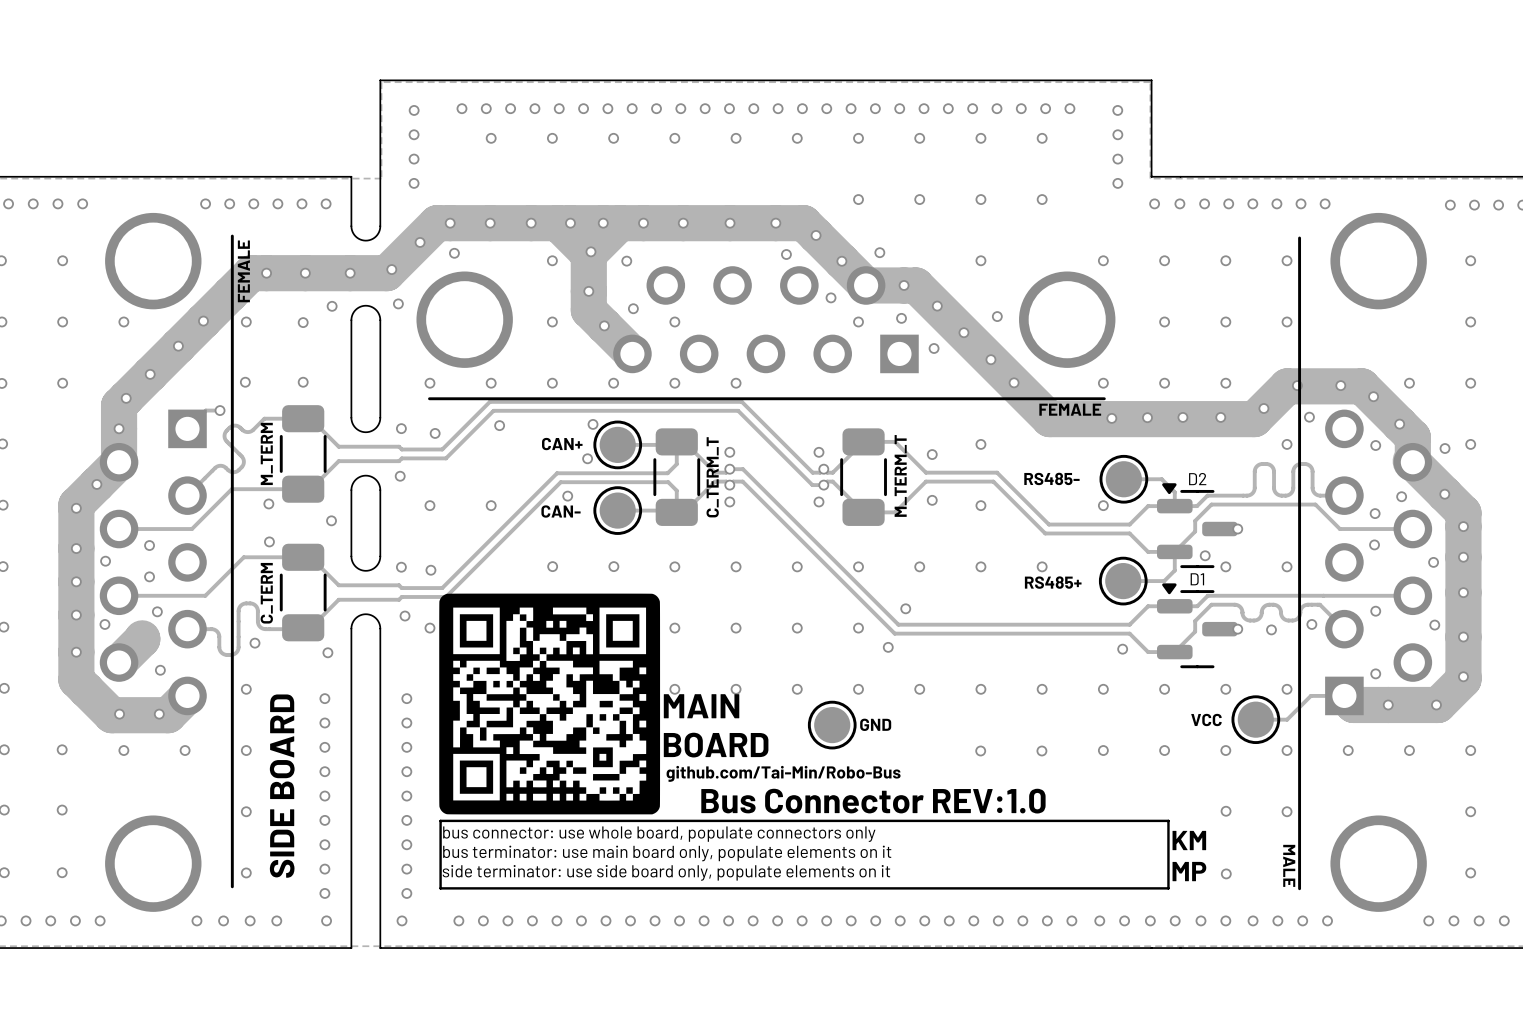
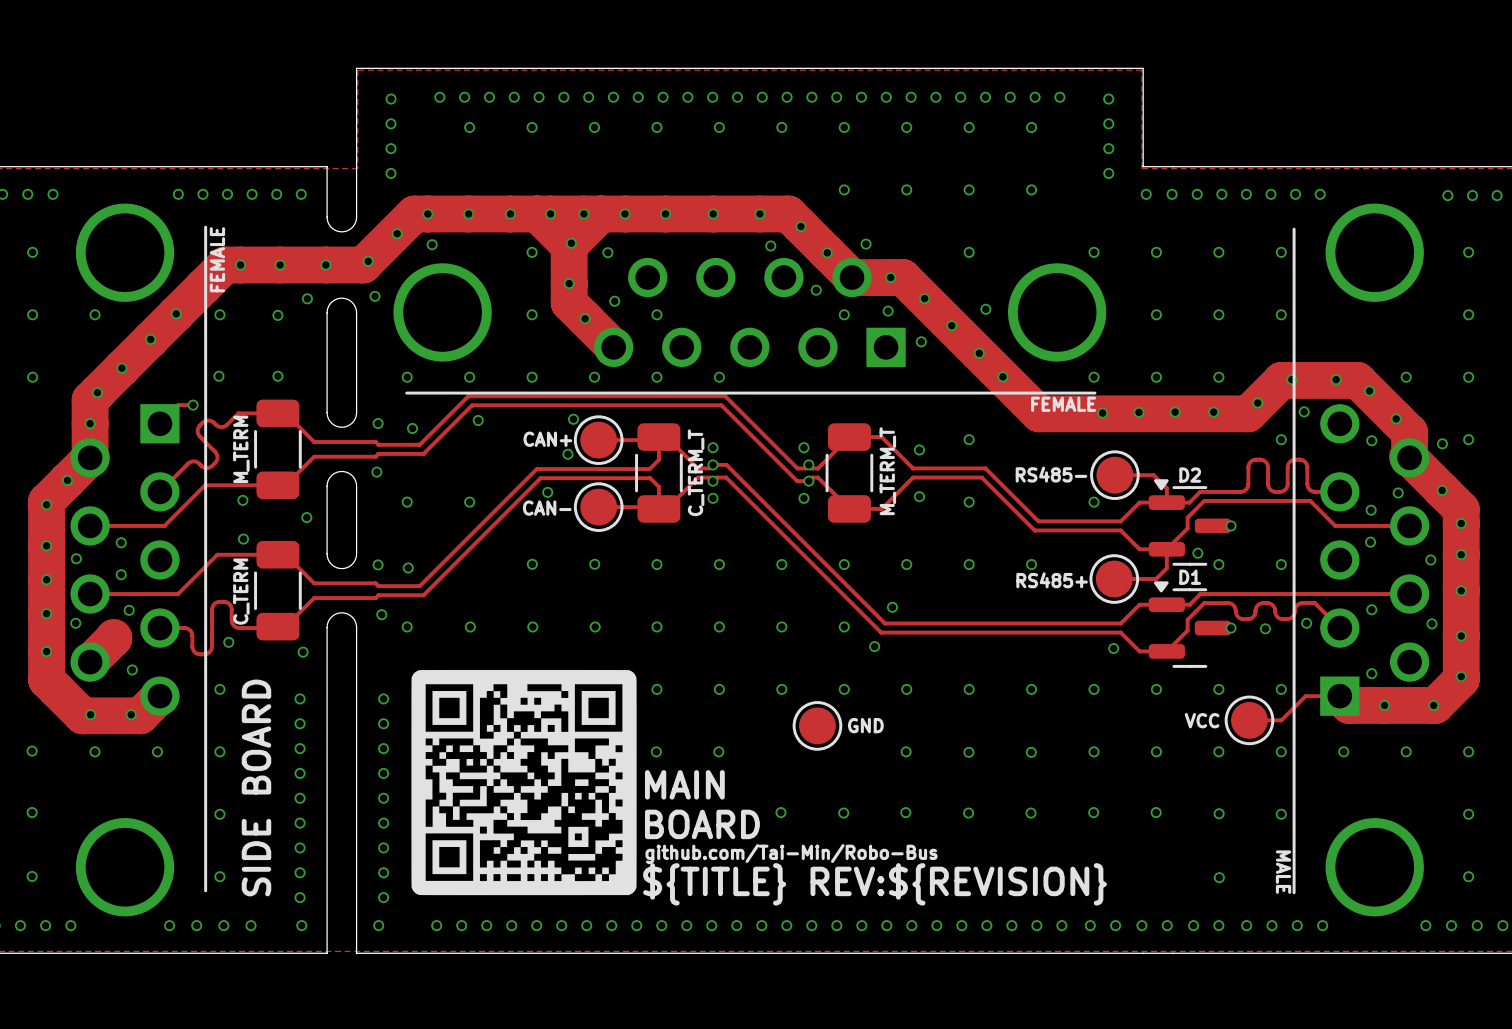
via: none -> (470, 626)
via: none -> (532, 626)
via: none -> (595, 626)
drawing position: (549, 704) -> (524, 782)
text position: MAIN (701, 706) -> MAIN (684, 784)
text position: BOARD (716, 745) -> BOARD (702, 824)
via: none -> (656, 751)
via: none -> (718, 751)
via: none -> (906, 751)
text position: github.com/Tai-Min/Robo-Bus (783, 773) -> github.com/Tai-Min/Robo-Bus (791, 854)
text: Bus Connector REV:1.0 (873, 801) -> none
via: none -> (780, 812)
via: none -> (843, 813)
via: none -> (905, 812)
via: none -> (968, 813)
via: none -> (1031, 813)
via: none -> (1093, 812)
via: none -> (1156, 812)
line: (440, 820) (1168, 820) (1168, 888) (440, 888) (440, 820) -> none
text: bus connector: use whole board, populate connectors only (659, 834) -> none
text: KM (1189, 840) -> none
text: bus terminator: use main board only, populate elements on it (667, 853) -> none
text: MP (1189, 871) -> none
text: side terminator: use side board only, populate elements on it (666, 872) -> none
text: none -> ${TITLE} REV:${REVISION} (875, 884)

